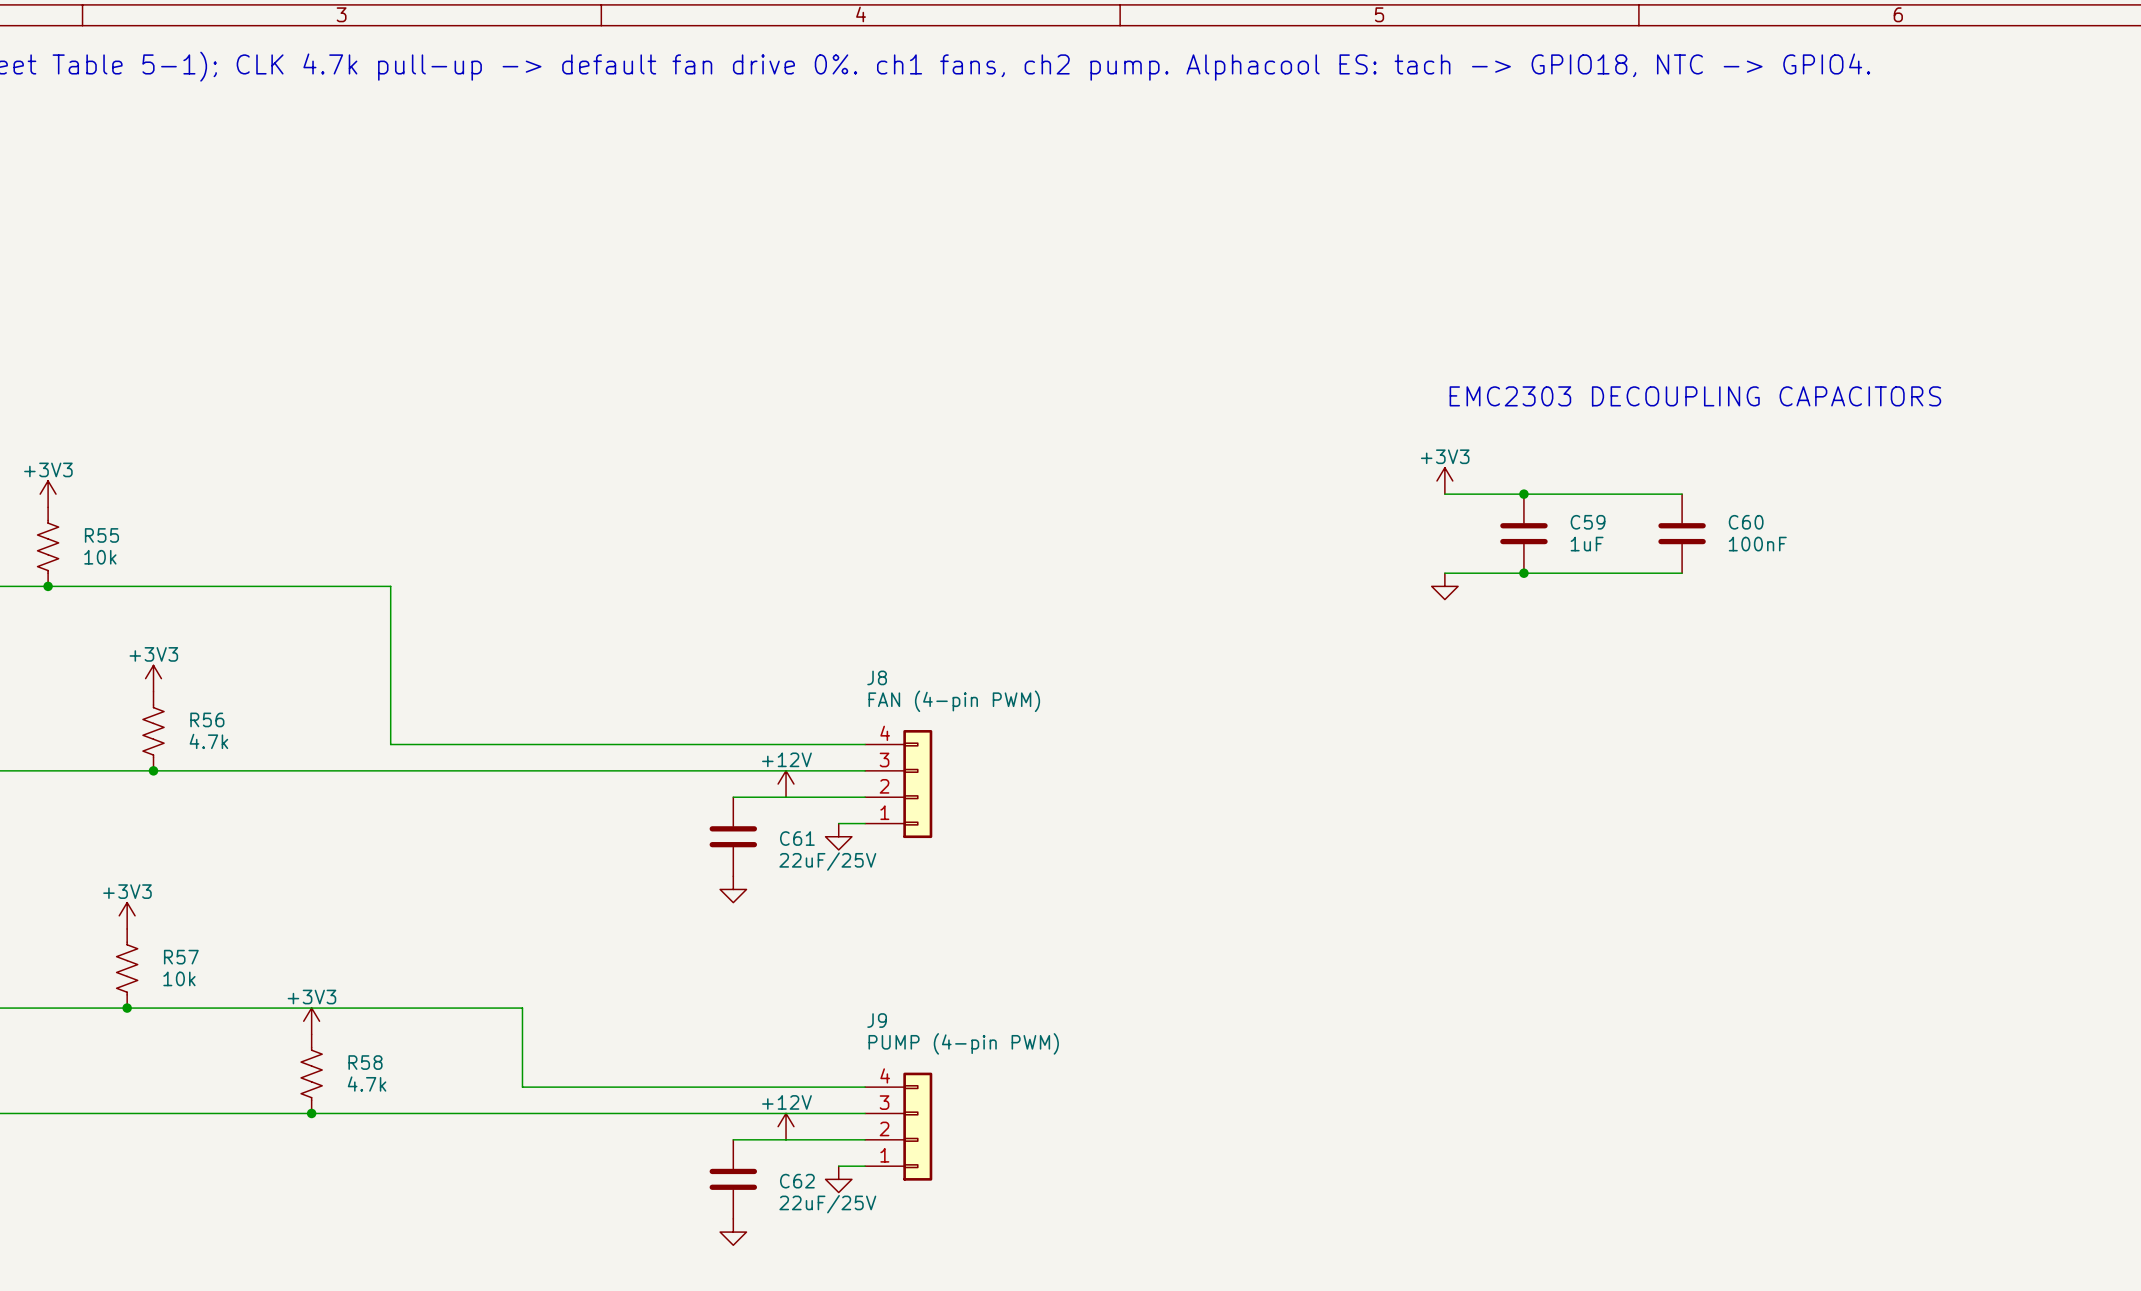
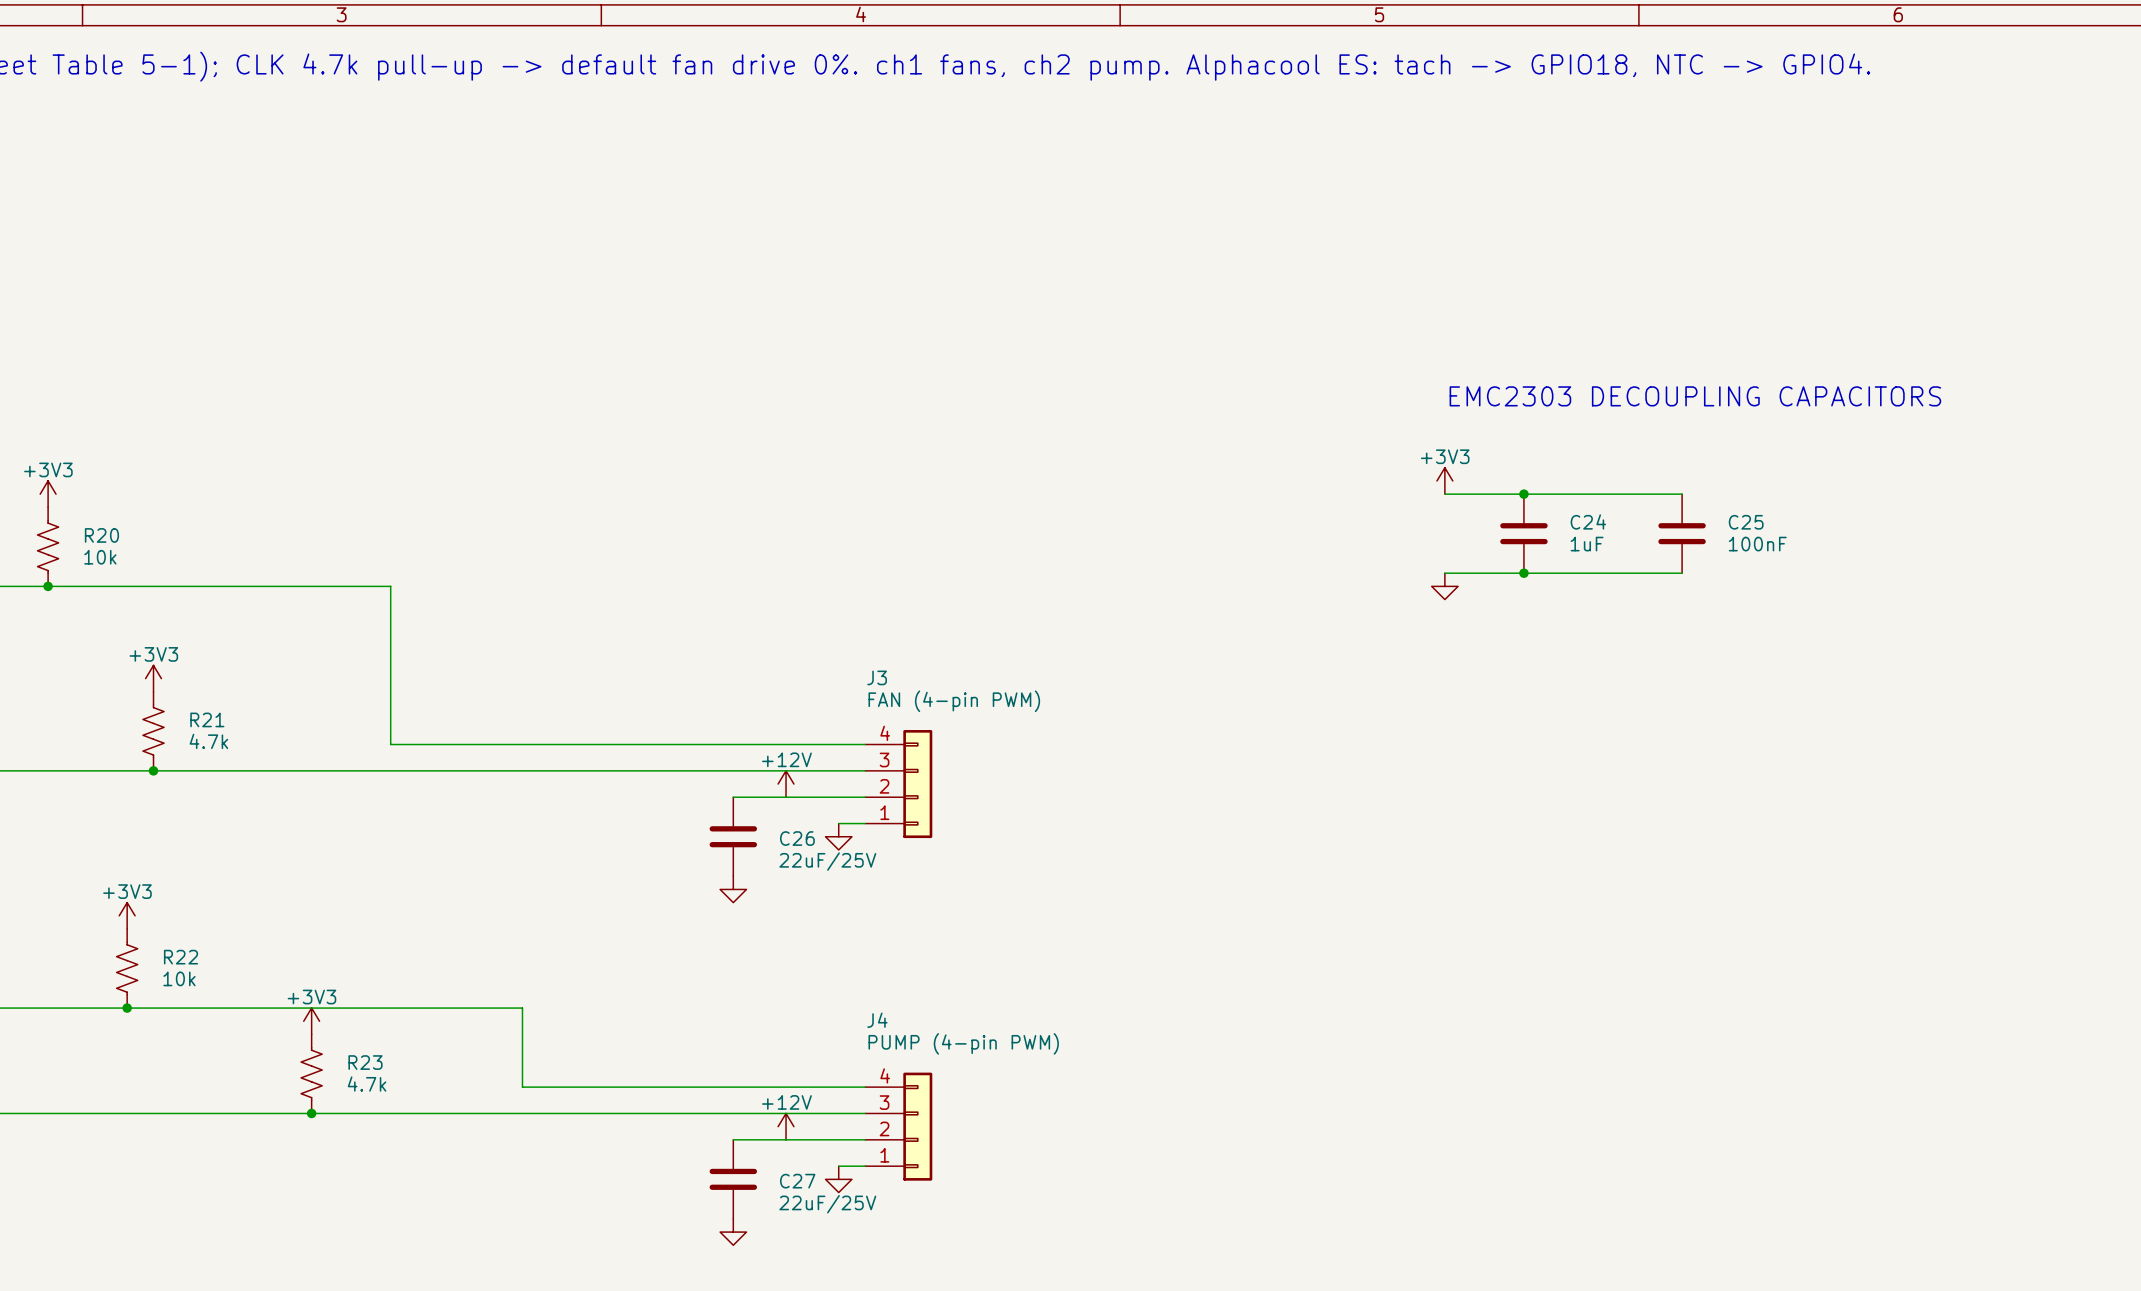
C59 name: C59 (1588, 522) -> C24 (1588, 521)
C60 name: C60 (1746, 522) -> C25 (1746, 522)
R55 name: R55 (101, 535) -> R20 (101, 535)
J8 name: J8 (877, 677) -> J3 (877, 677)
R56 name: R56 (207, 719) -> R21 (207, 719)
C61 name: C61 (797, 838) -> C26 (797, 838)
R57 name: R57 (181, 957) -> R22 (181, 957)
J9 name: J9 (877, 1020) -> J4 (877, 1020)
R58 name: R58 (365, 1062) -> R23 (365, 1062)
C62 name: C62 (797, 1181) -> C27 (797, 1181)

